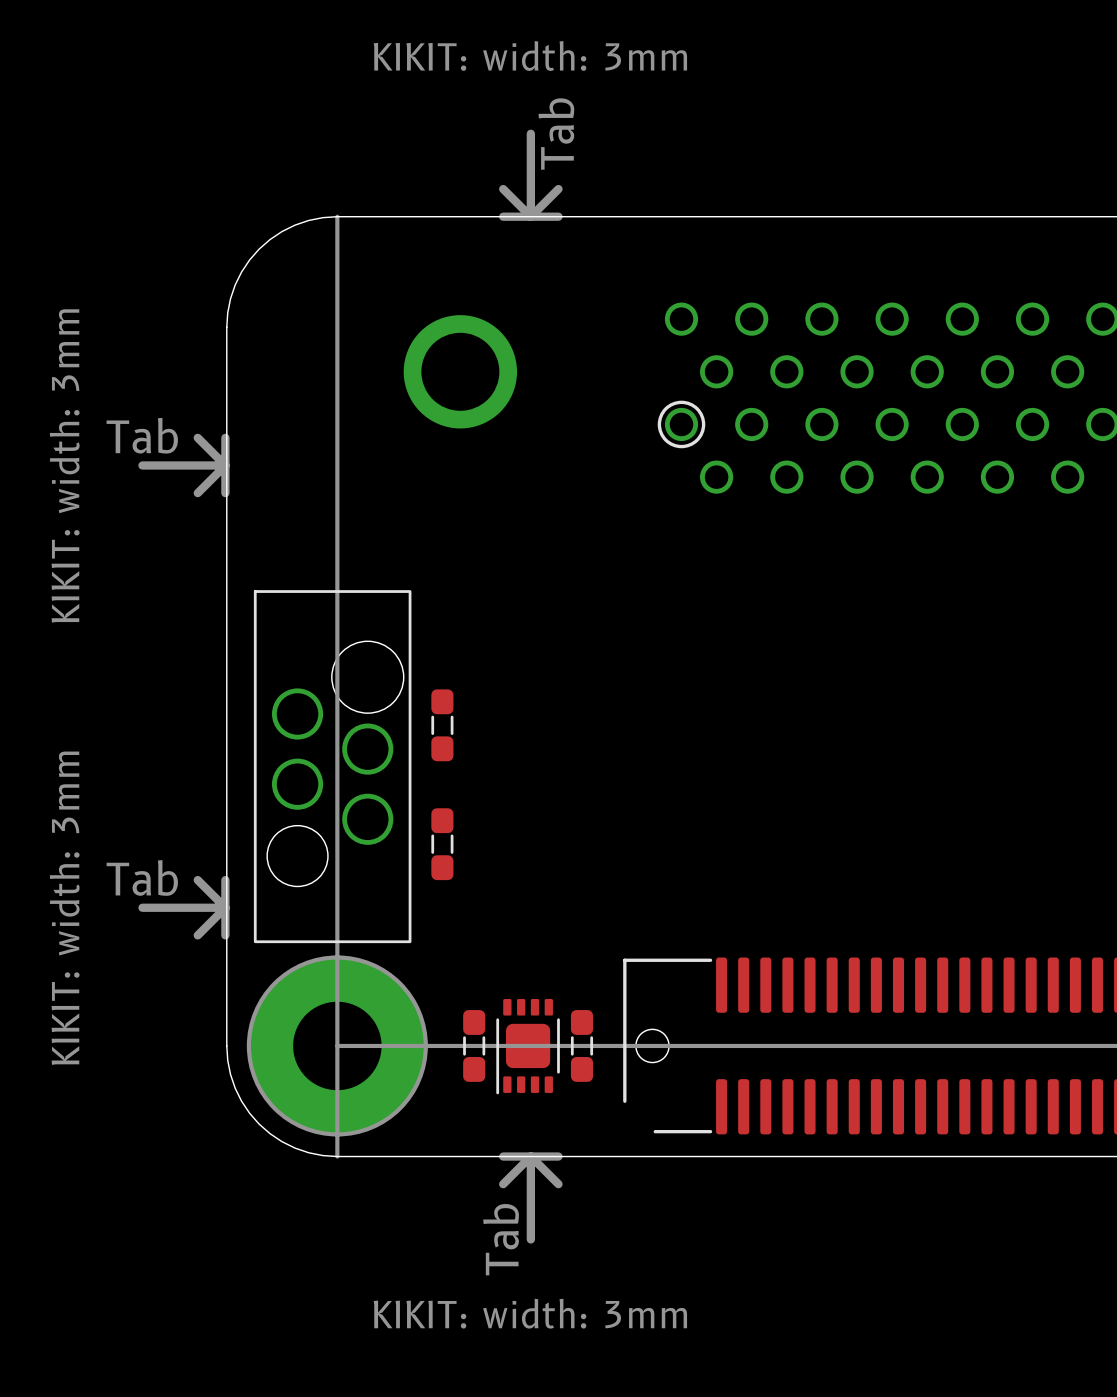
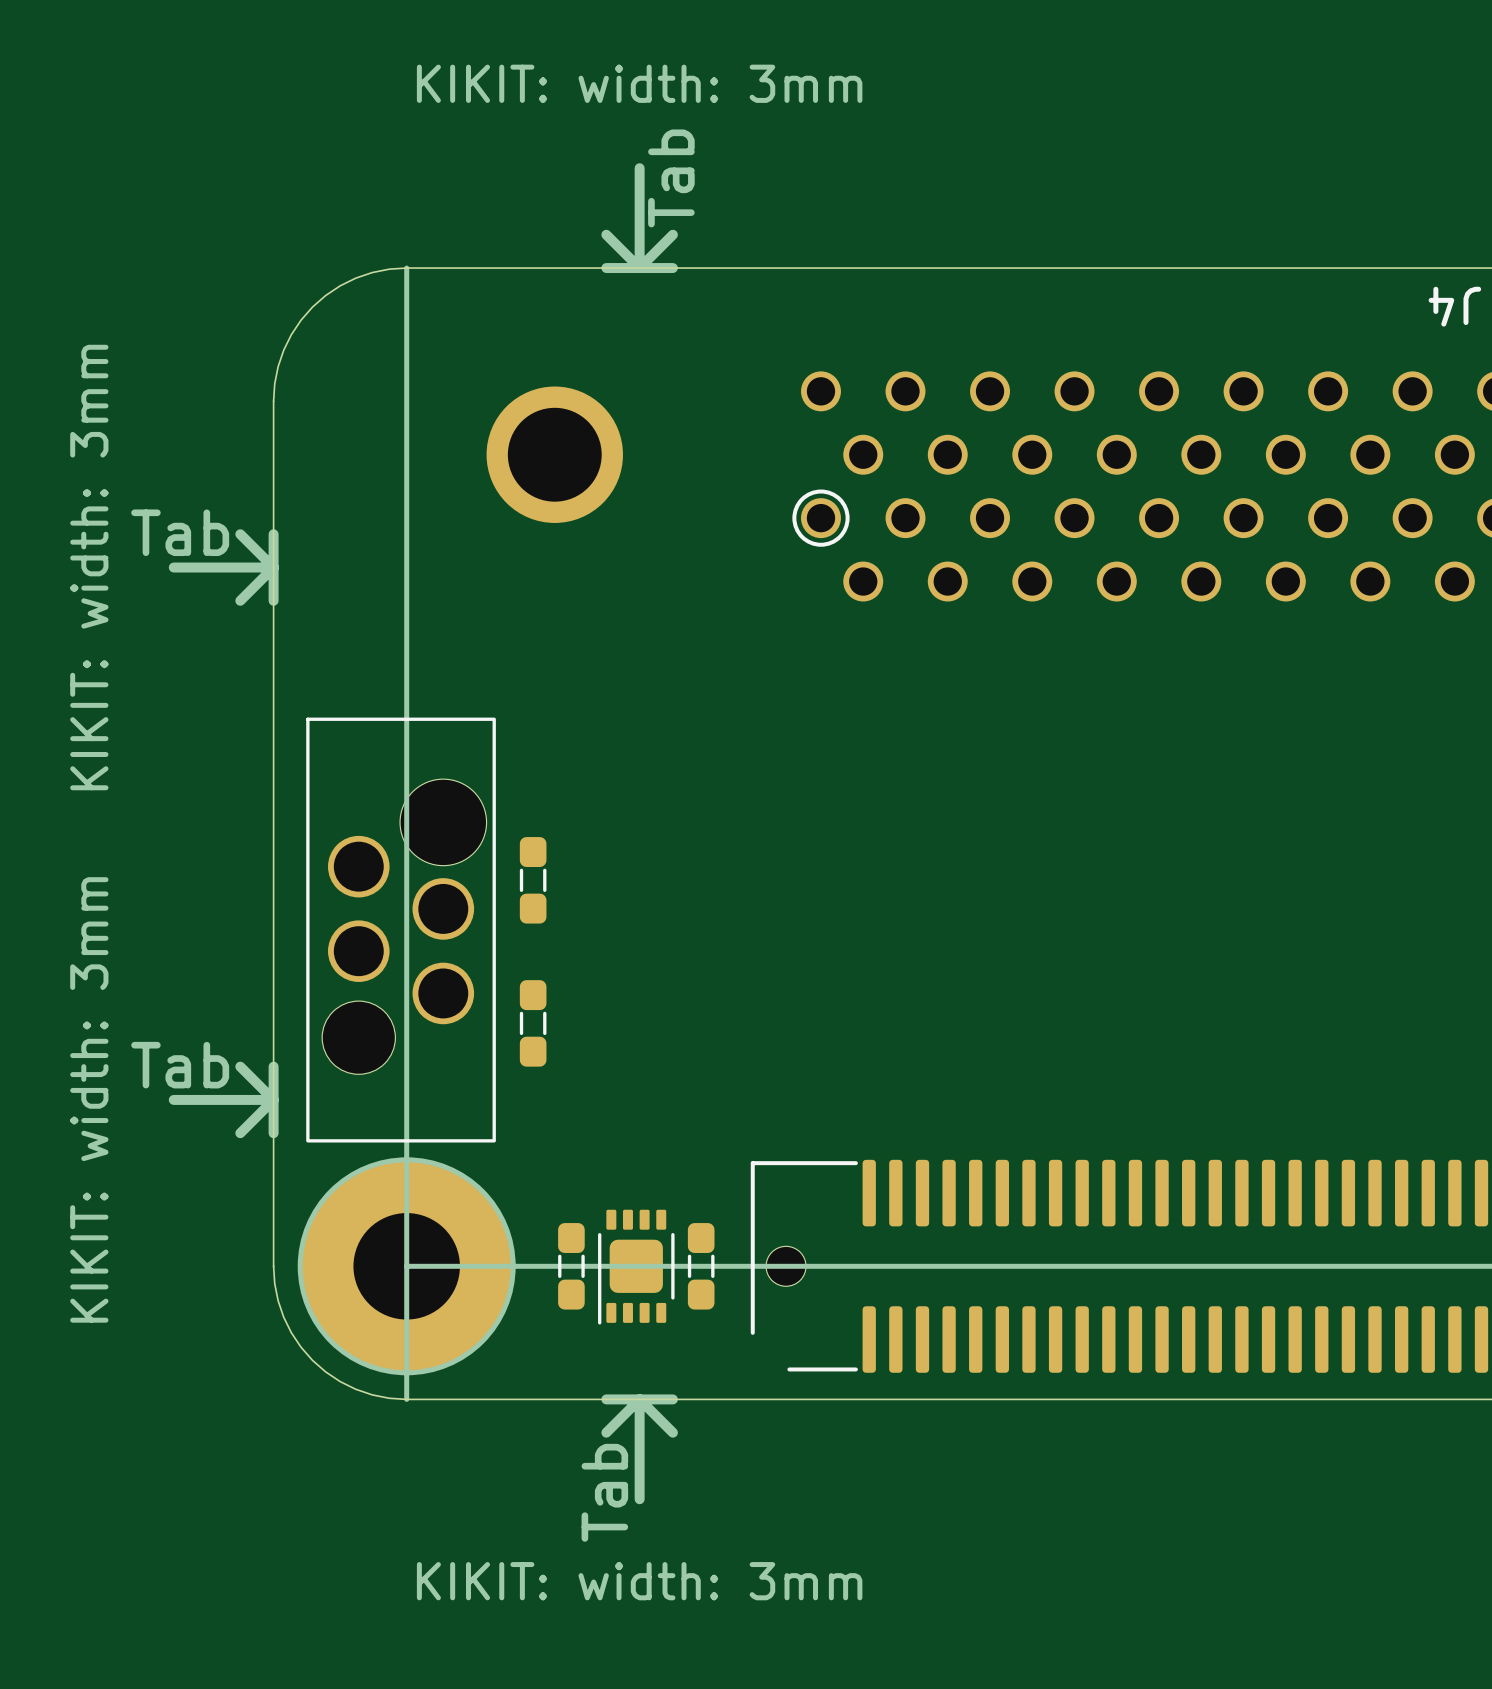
drawing shape: [373, 41, 688, 221] -> [416, 64, 863, 274]
drawing shape: [49, 309, 230, 623] -> [70, 344, 279, 791]
drawing shape: [49, 751, 230, 1065] -> [70, 877, 279, 1323]
drawing shape: [373, 1152, 688, 1329] -> [416, 1394, 863, 1601]

